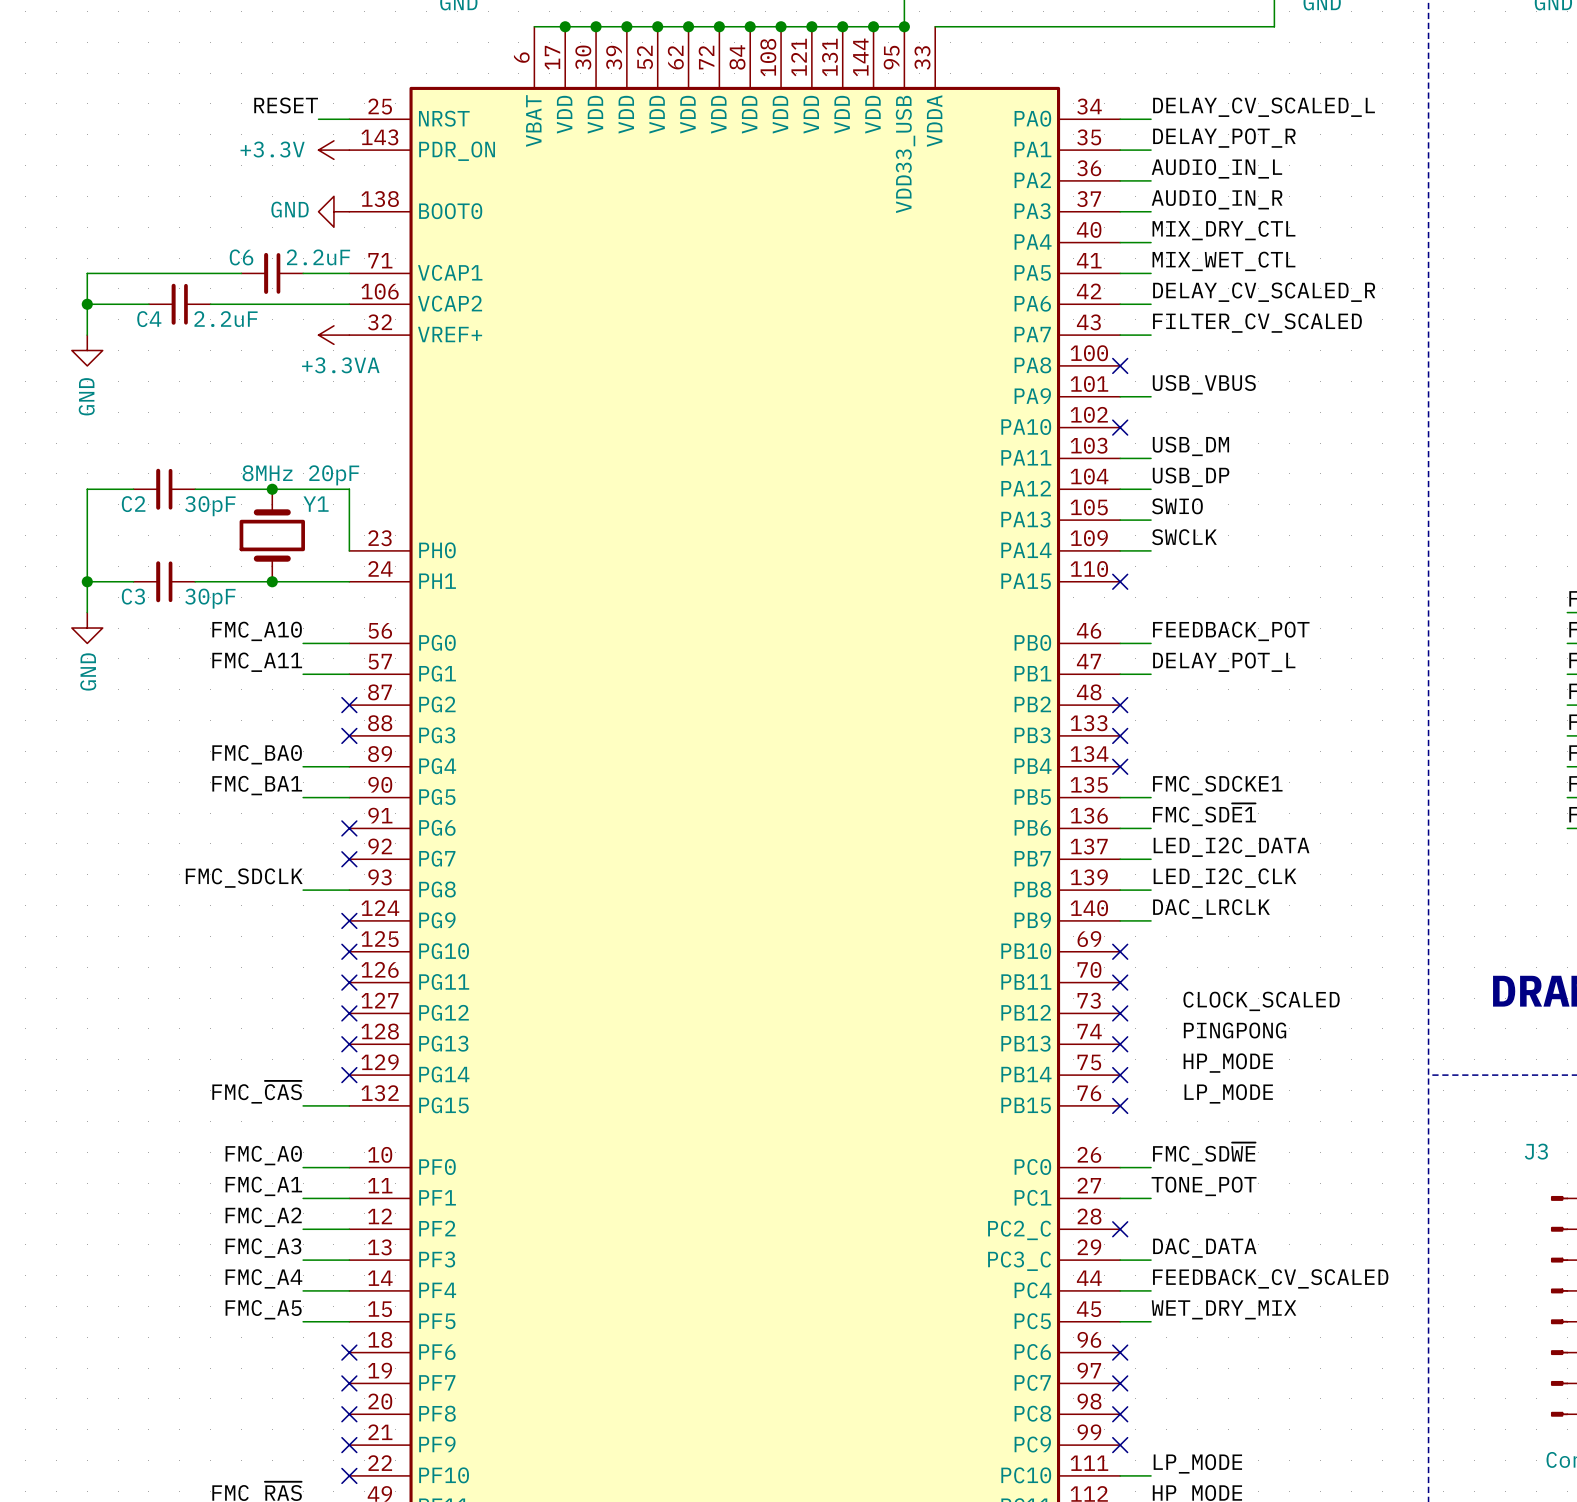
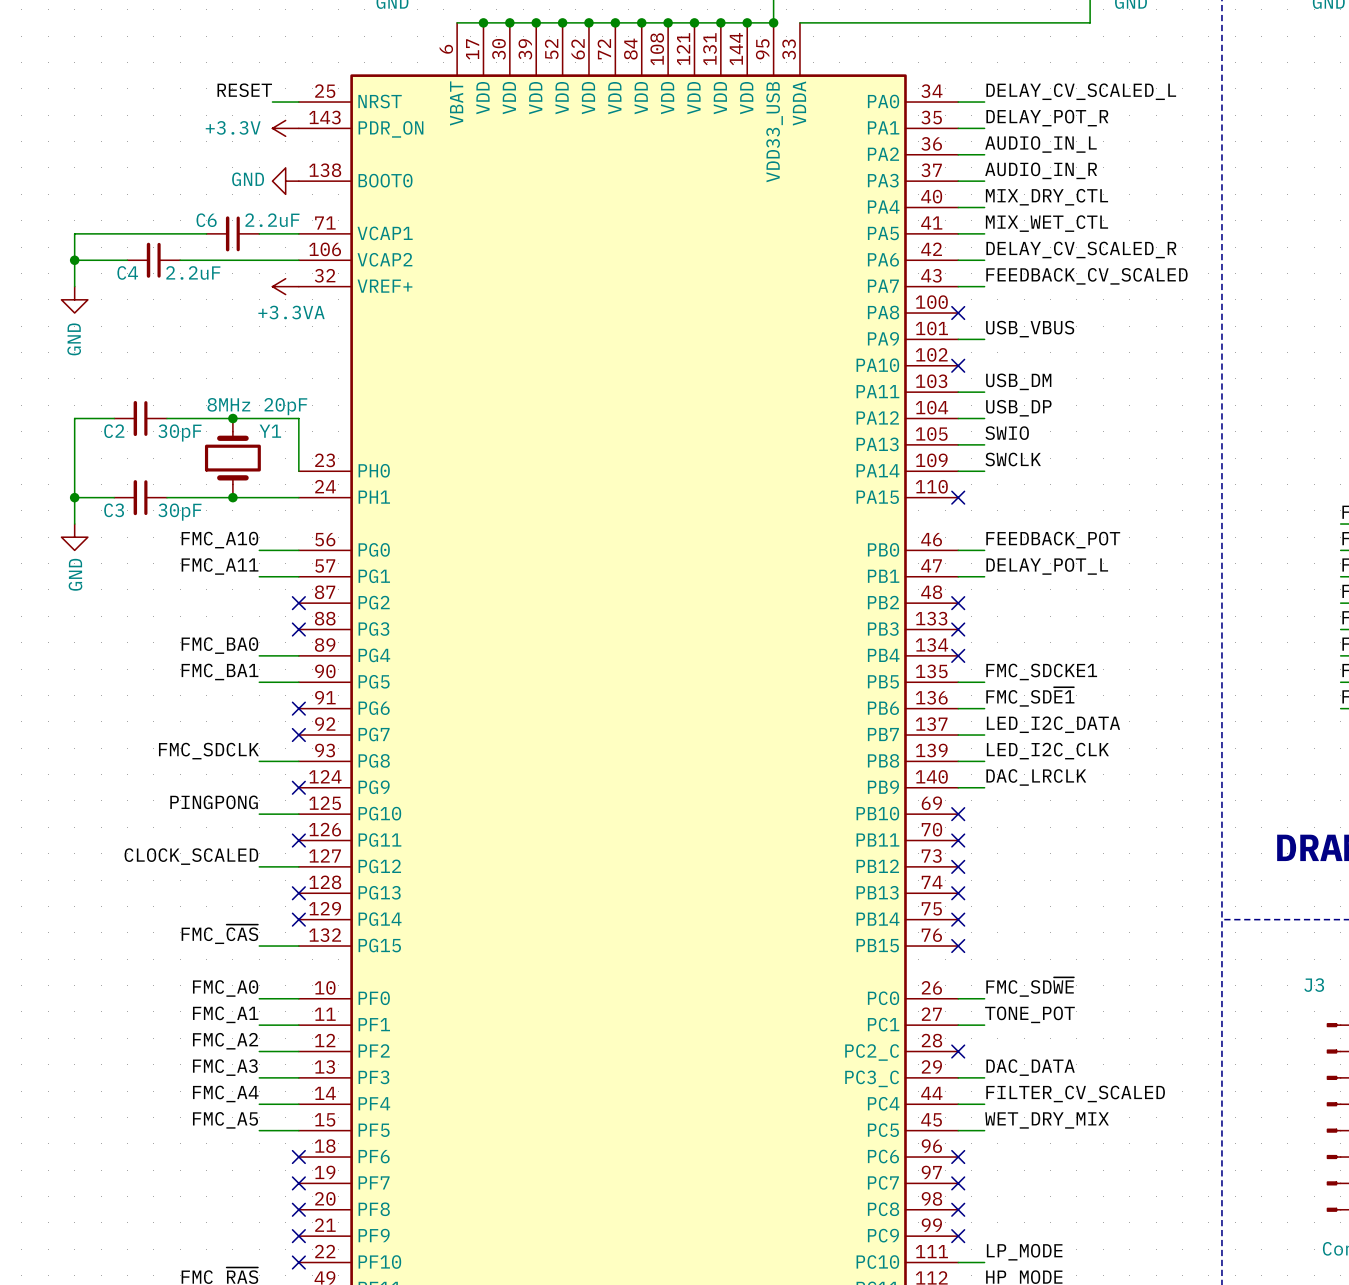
label: FILTER_CV_SCALED (1257, 323) -> FEEDBACK_CV_SCALED (1086, 276)
label: none -> PINGPONG (214, 802)
wire: none -> (259, 814) (298, 814)
no-connect mark: (349, 951) -> none
label: none -> CLOCK_SCALED (191, 856)
label: CLOCK_SCALED (1261, 1001) -> none
wire: none -> (259, 866) (298, 866)
no-connect mark: (349, 1013) -> none
label: PINGPONG (1235, 1030) -> none
label: HP_MODE (1228, 1063) -> none
label: LP_MODE (1228, 1093) -> none
label: FEEDBACK_CV_SCALED (1270, 1278) -> FILTER_CV_SCALED (1075, 1093)

